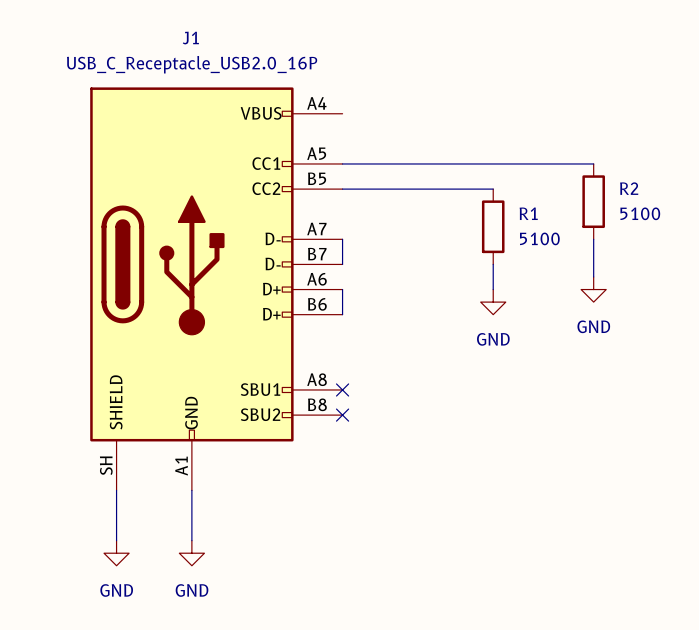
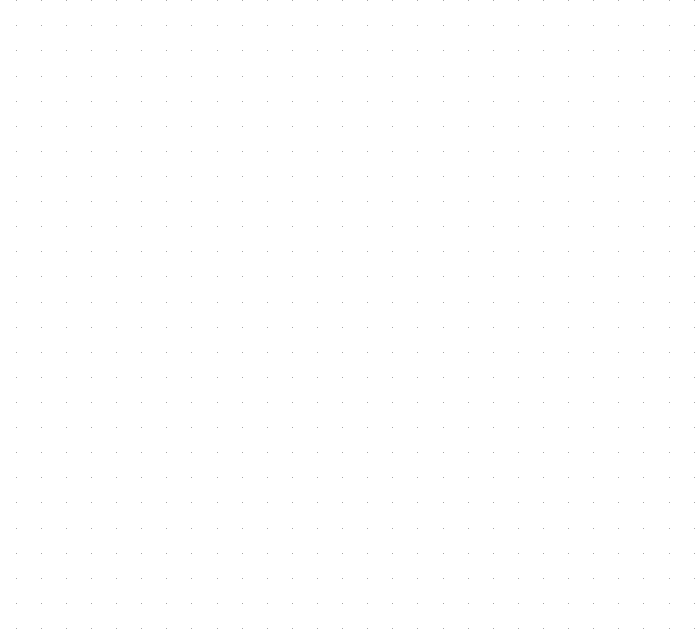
wire: (342, 163) (593, 163) -> none
wire: (342, 189) (493, 189) -> none
R2: 5100 (593, 201) -> none
R1: 5100 (493, 226) -> none
wire: (342, 239) (342, 264) -> none
wire: (593, 239) (593, 276) -> none
wire: (493, 264) (493, 289) -> none
J1: USB_C_Receptacle_USB2.0_16P (216, 288) -> none
wire: (342, 289) (342, 314) -> none
power symbol: GND (593, 289) -> none
power symbol: GND (493, 302) -> none
no-connect mark: (342, 389) -> none
no-connect mark: (342, 415) -> none
wire: (116, 490) (116, 540) -> none
wire: (191, 490) (191, 540) -> none
power symbol: GND (116, 553) -> none
power symbol: GND (191, 553) -> none

